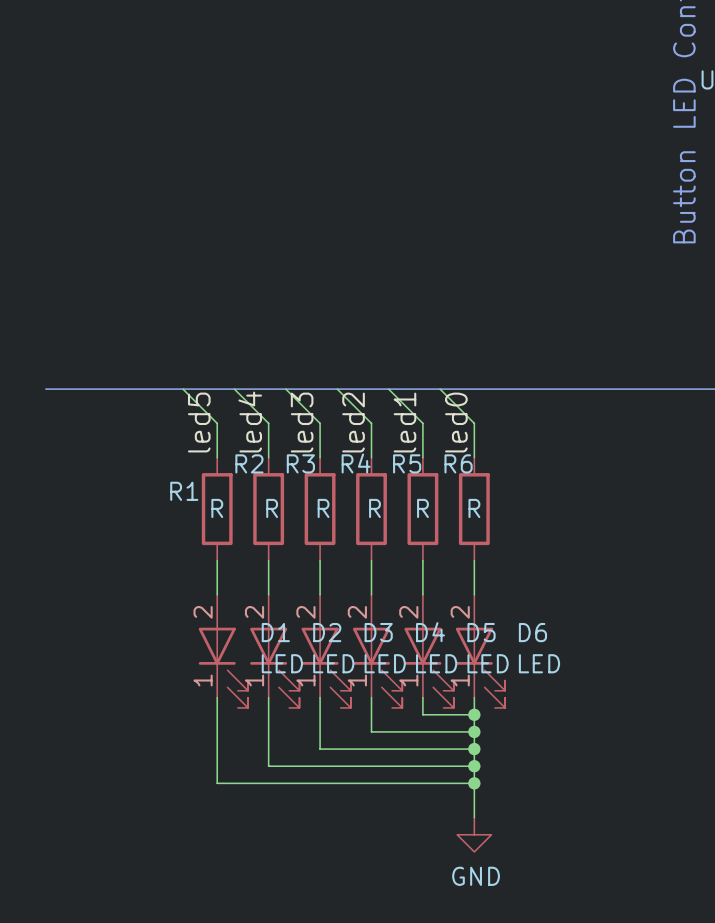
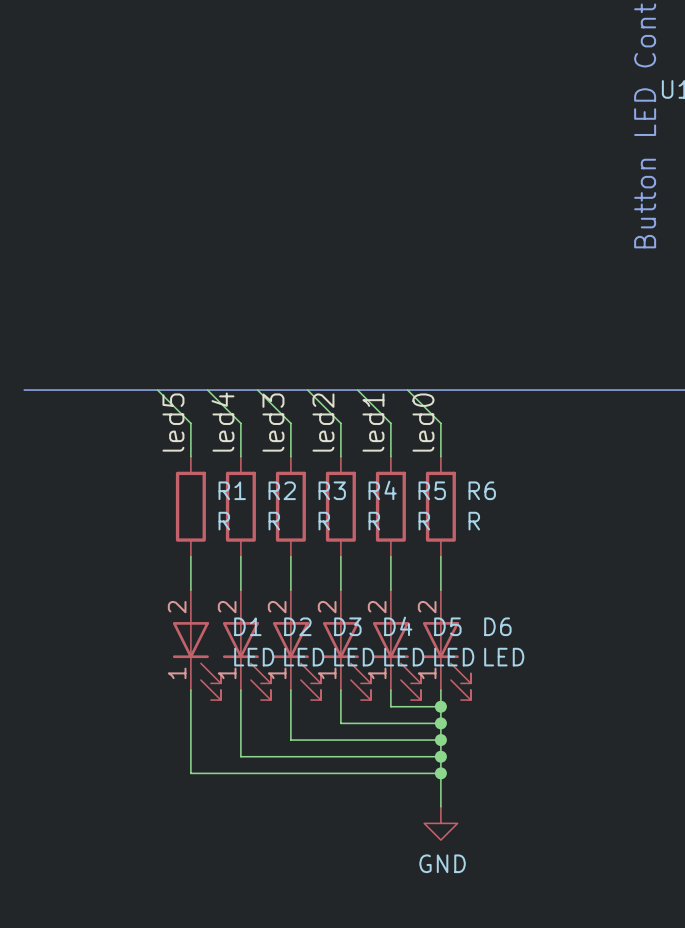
R2 name position: R2 (249, 463) -> R2 (282, 490)
R3 name position: R3 (300, 463) -> R3 (332, 490)
R4 name position: R4 (356, 463) -> R4 (382, 490)
R5 name position: R5 (407, 463) -> R5 (432, 490)
R6 name position: R6 (458, 463) -> R6 (482, 490)
R1 name position: R1 (184, 491) -> R1 (232, 490)
R1 value position: R (217, 508) -> R (224, 521)
R2 value position: R (272, 508) -> R (274, 521)
R3 value position: R (323, 508) -> R (324, 521)
R4 value position: R (374, 508) -> R (374, 521)
R5 value position: R (422, 508) -> R (424, 521)
R6 value position: R (474, 508) -> R (474, 521)

